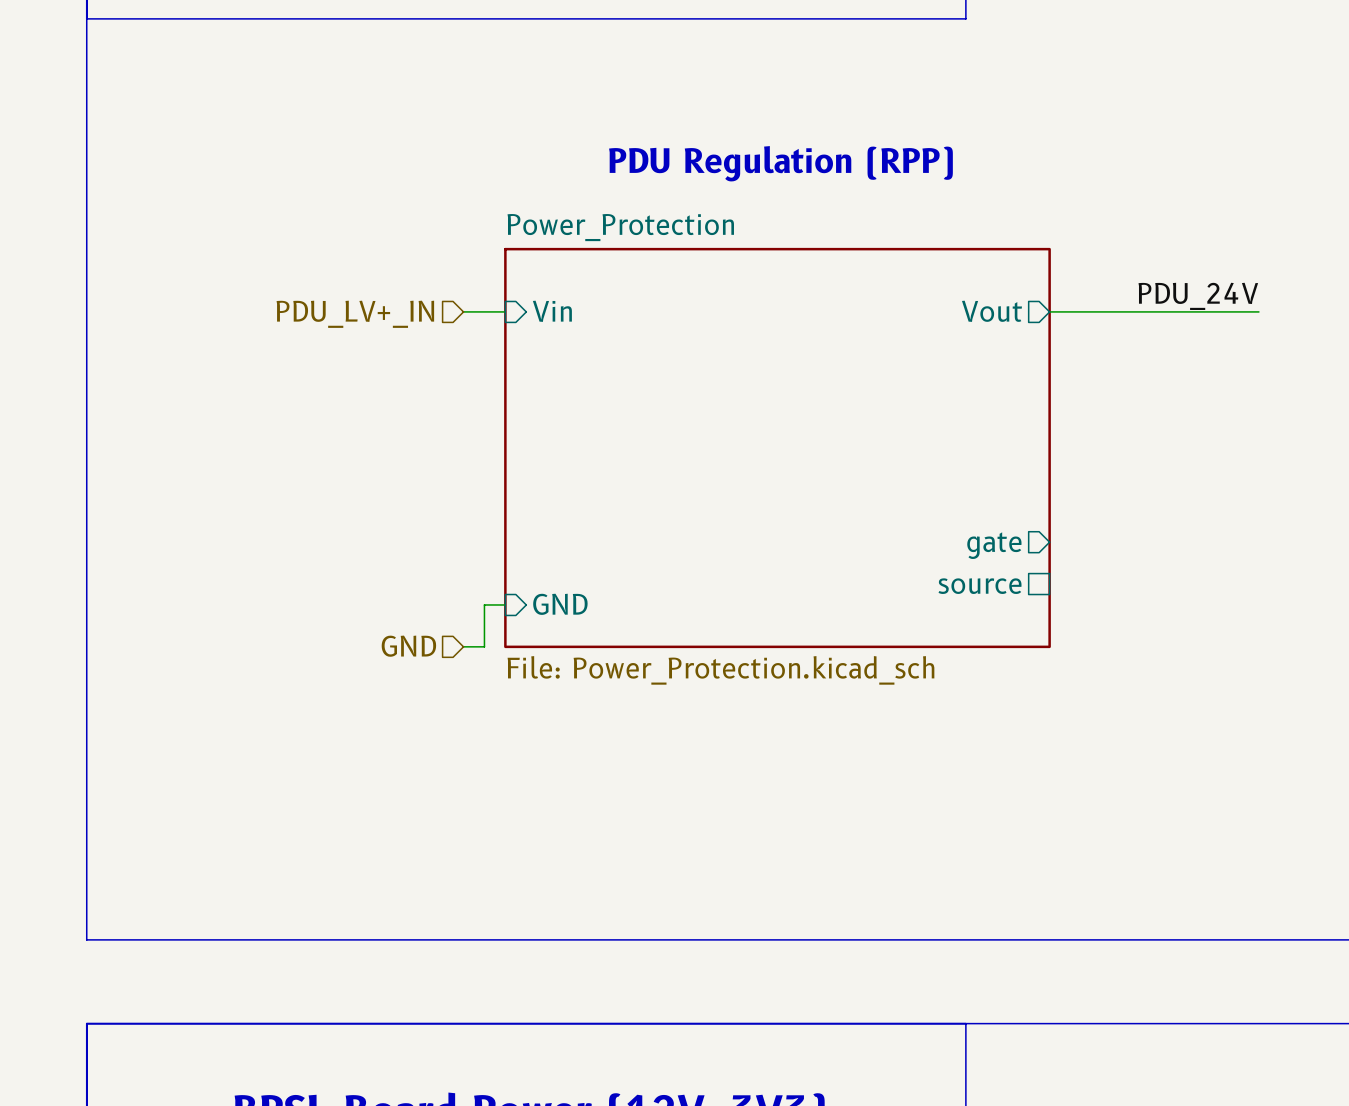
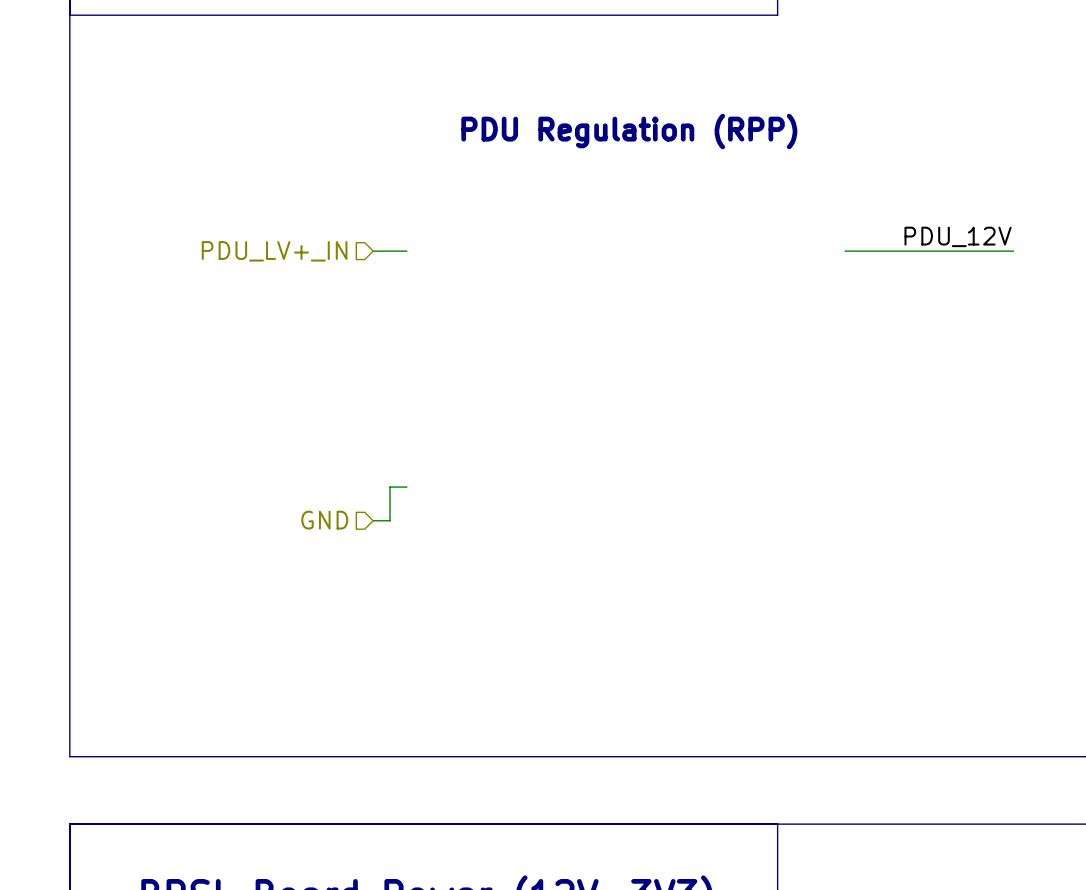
label: PDU_24V (1198, 296) -> PDU_12V (958, 236)
sheet pin: Vin (552, 311) -> none
sheet pin: Vout (991, 311) -> none
sheet Power_Protection: File: Power_Protection.kicad_sch (777, 447) -> none
sheet pin: gate (994, 545) -> none
sheet pin: source (980, 586) -> none
sheet pin: GND (560, 604) -> none

